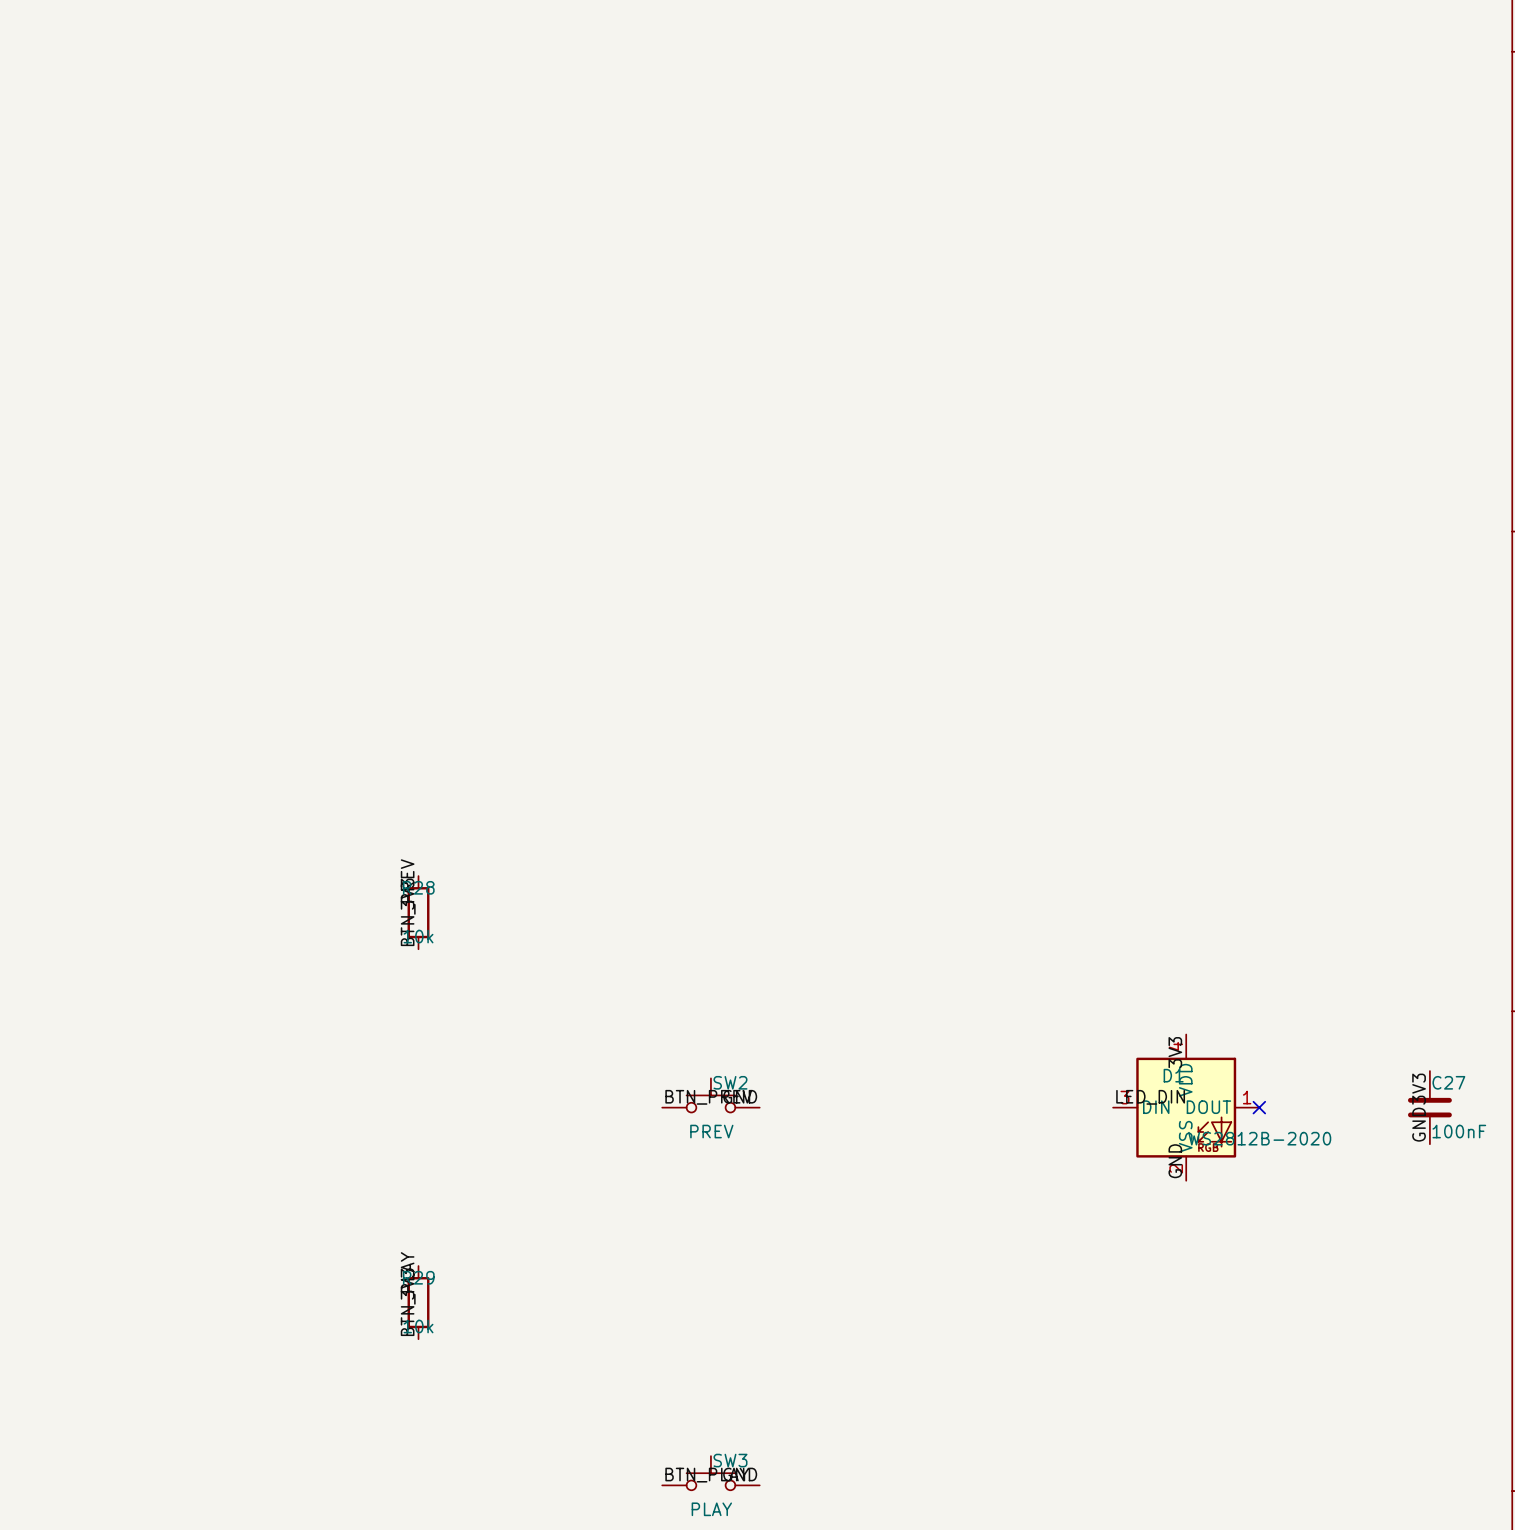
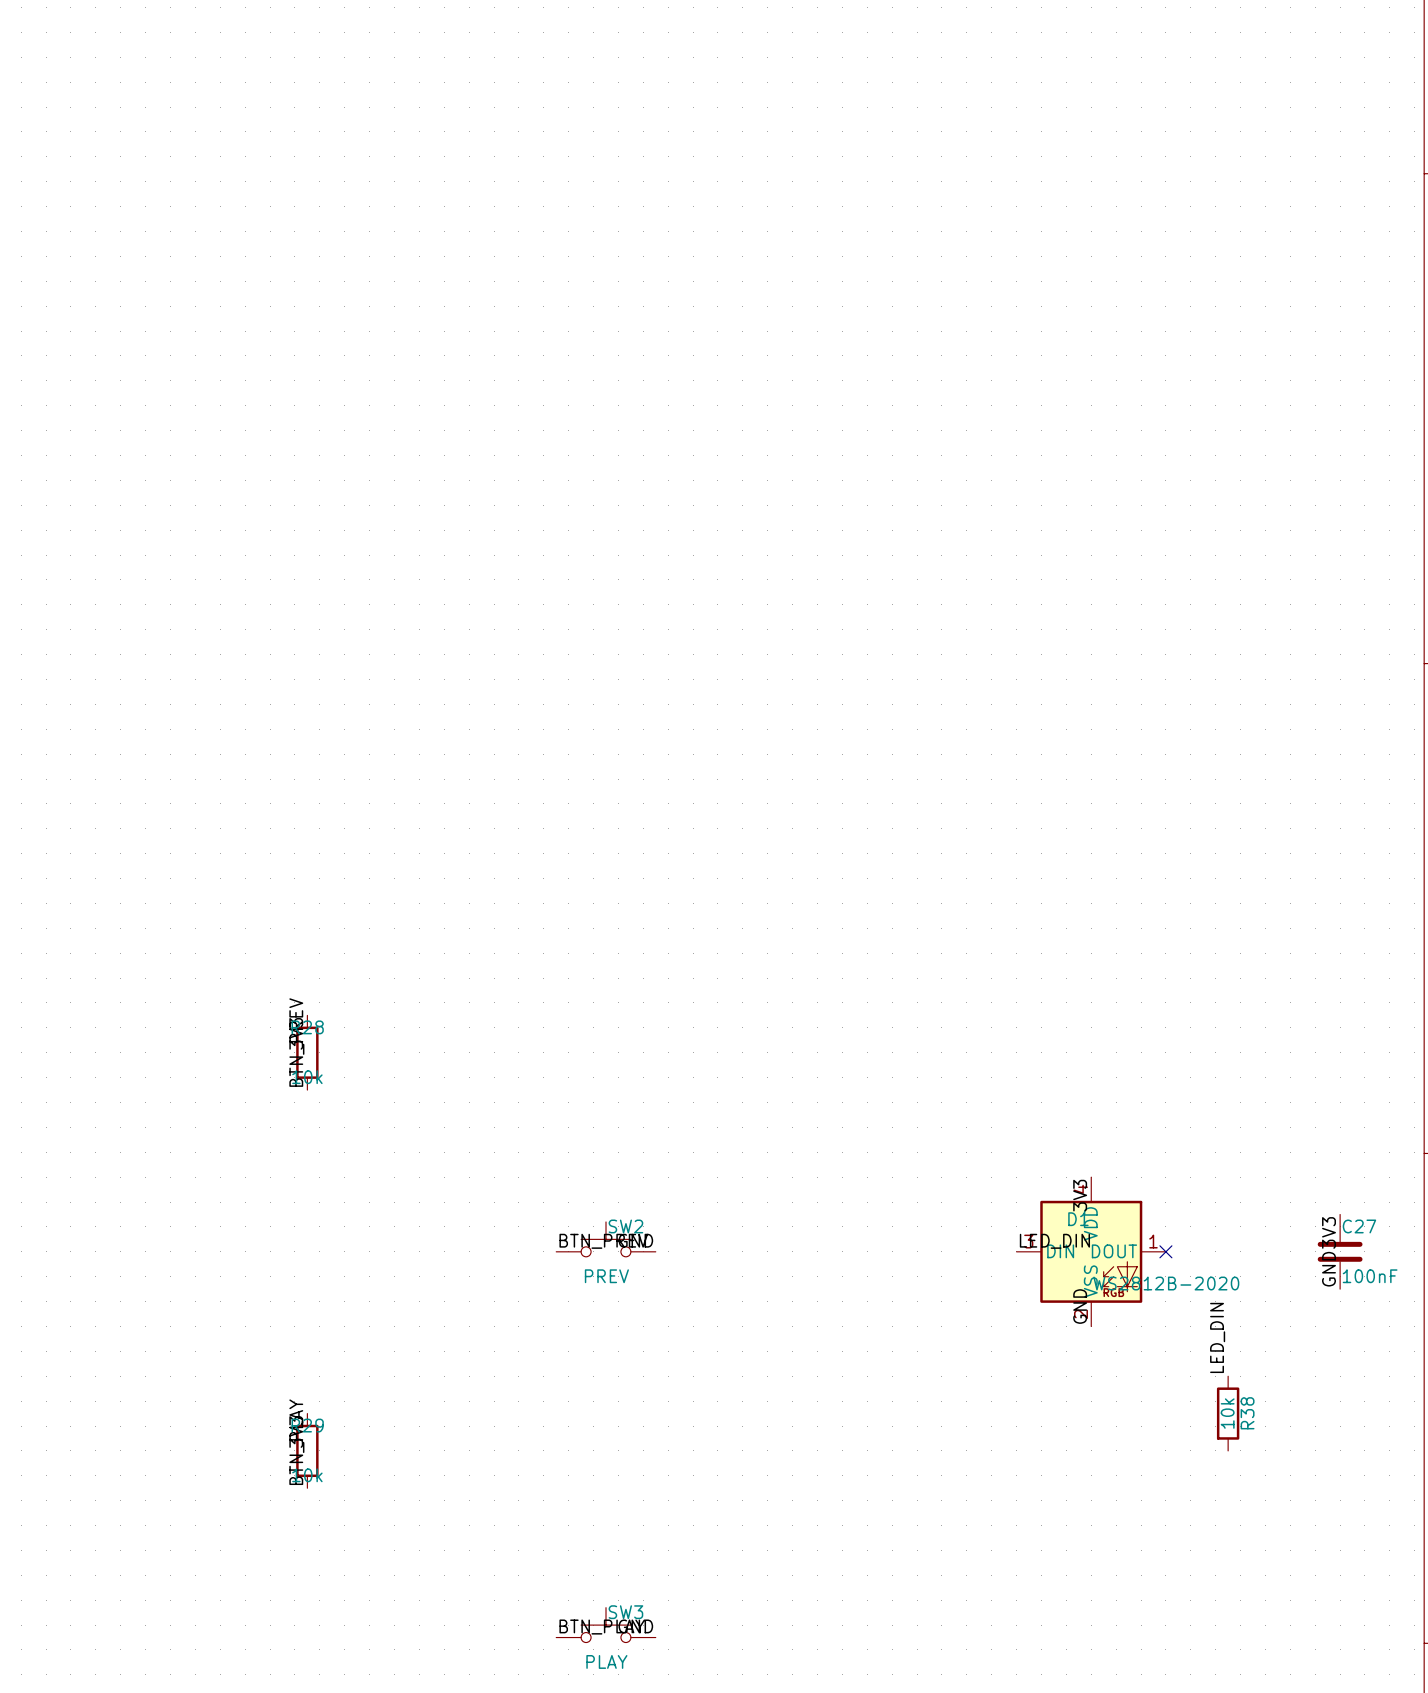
label: none -> LED_DIN (1217, 1337)
R38: none -> 10k (1228, 1413)

